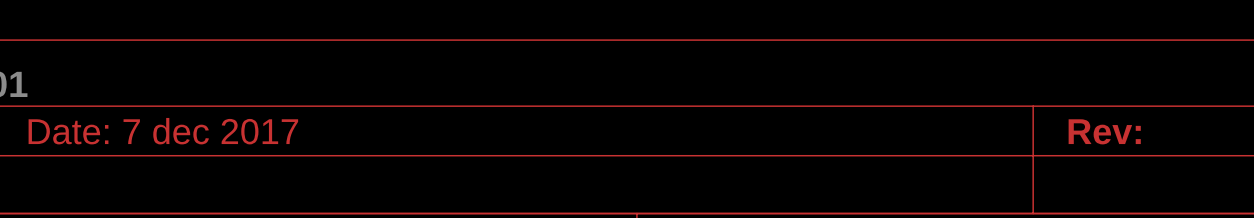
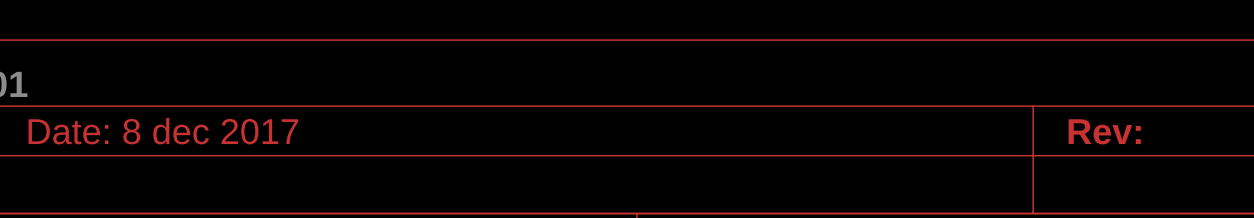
title block: Date: 7 dec 2017 (163, 131) -> Date: 8 dec 2017 (163, 131)

